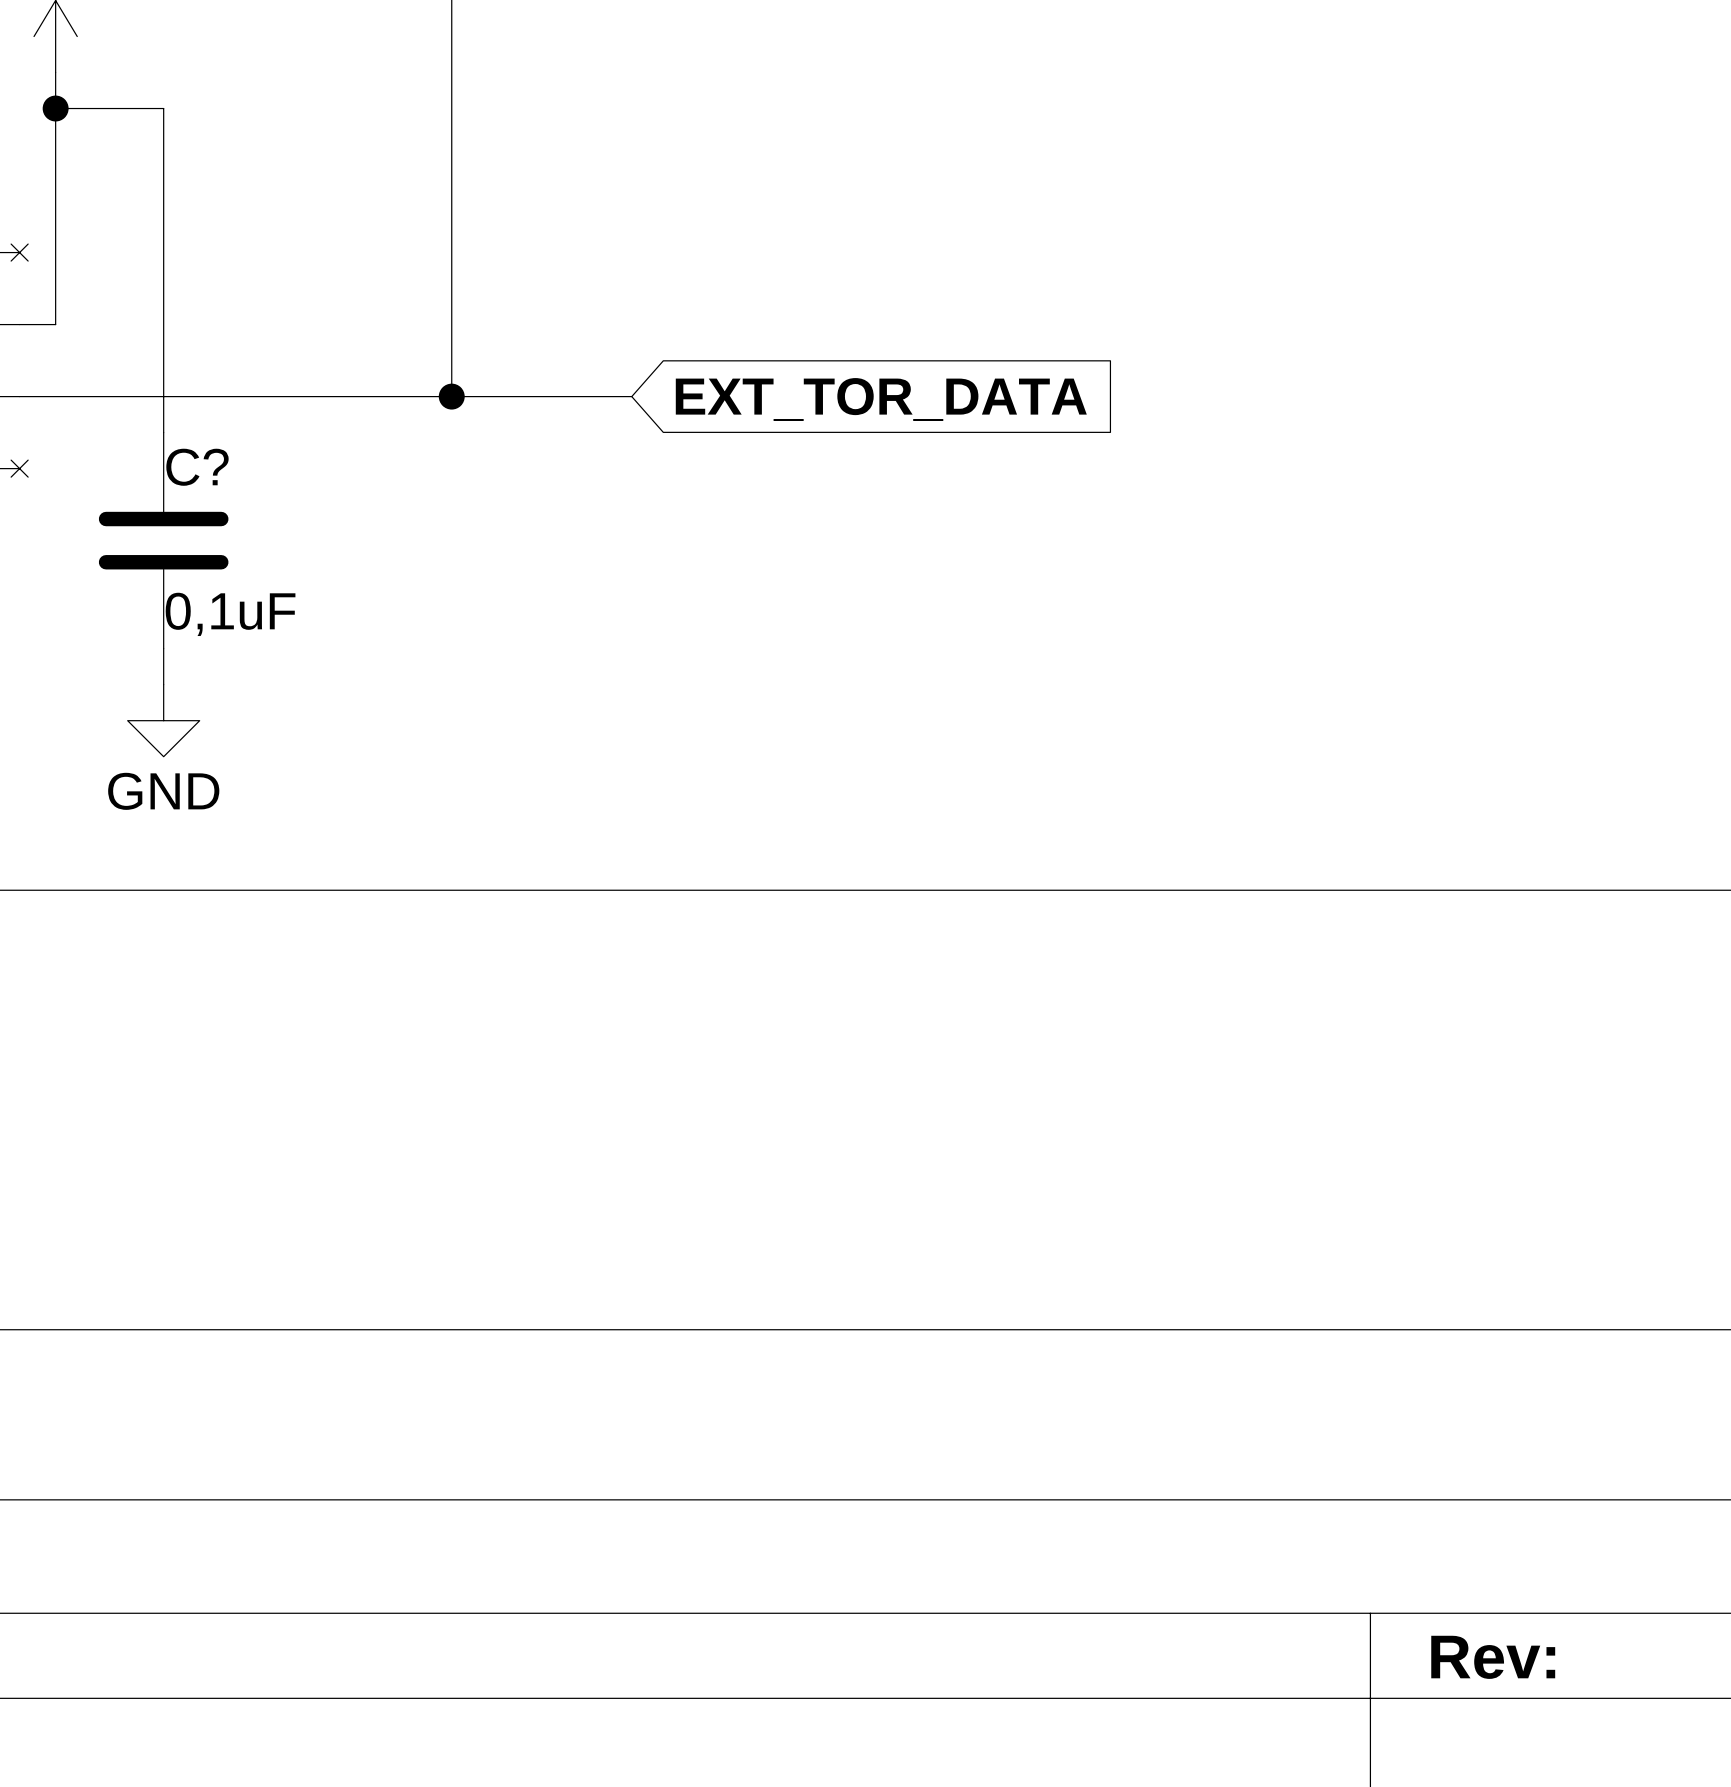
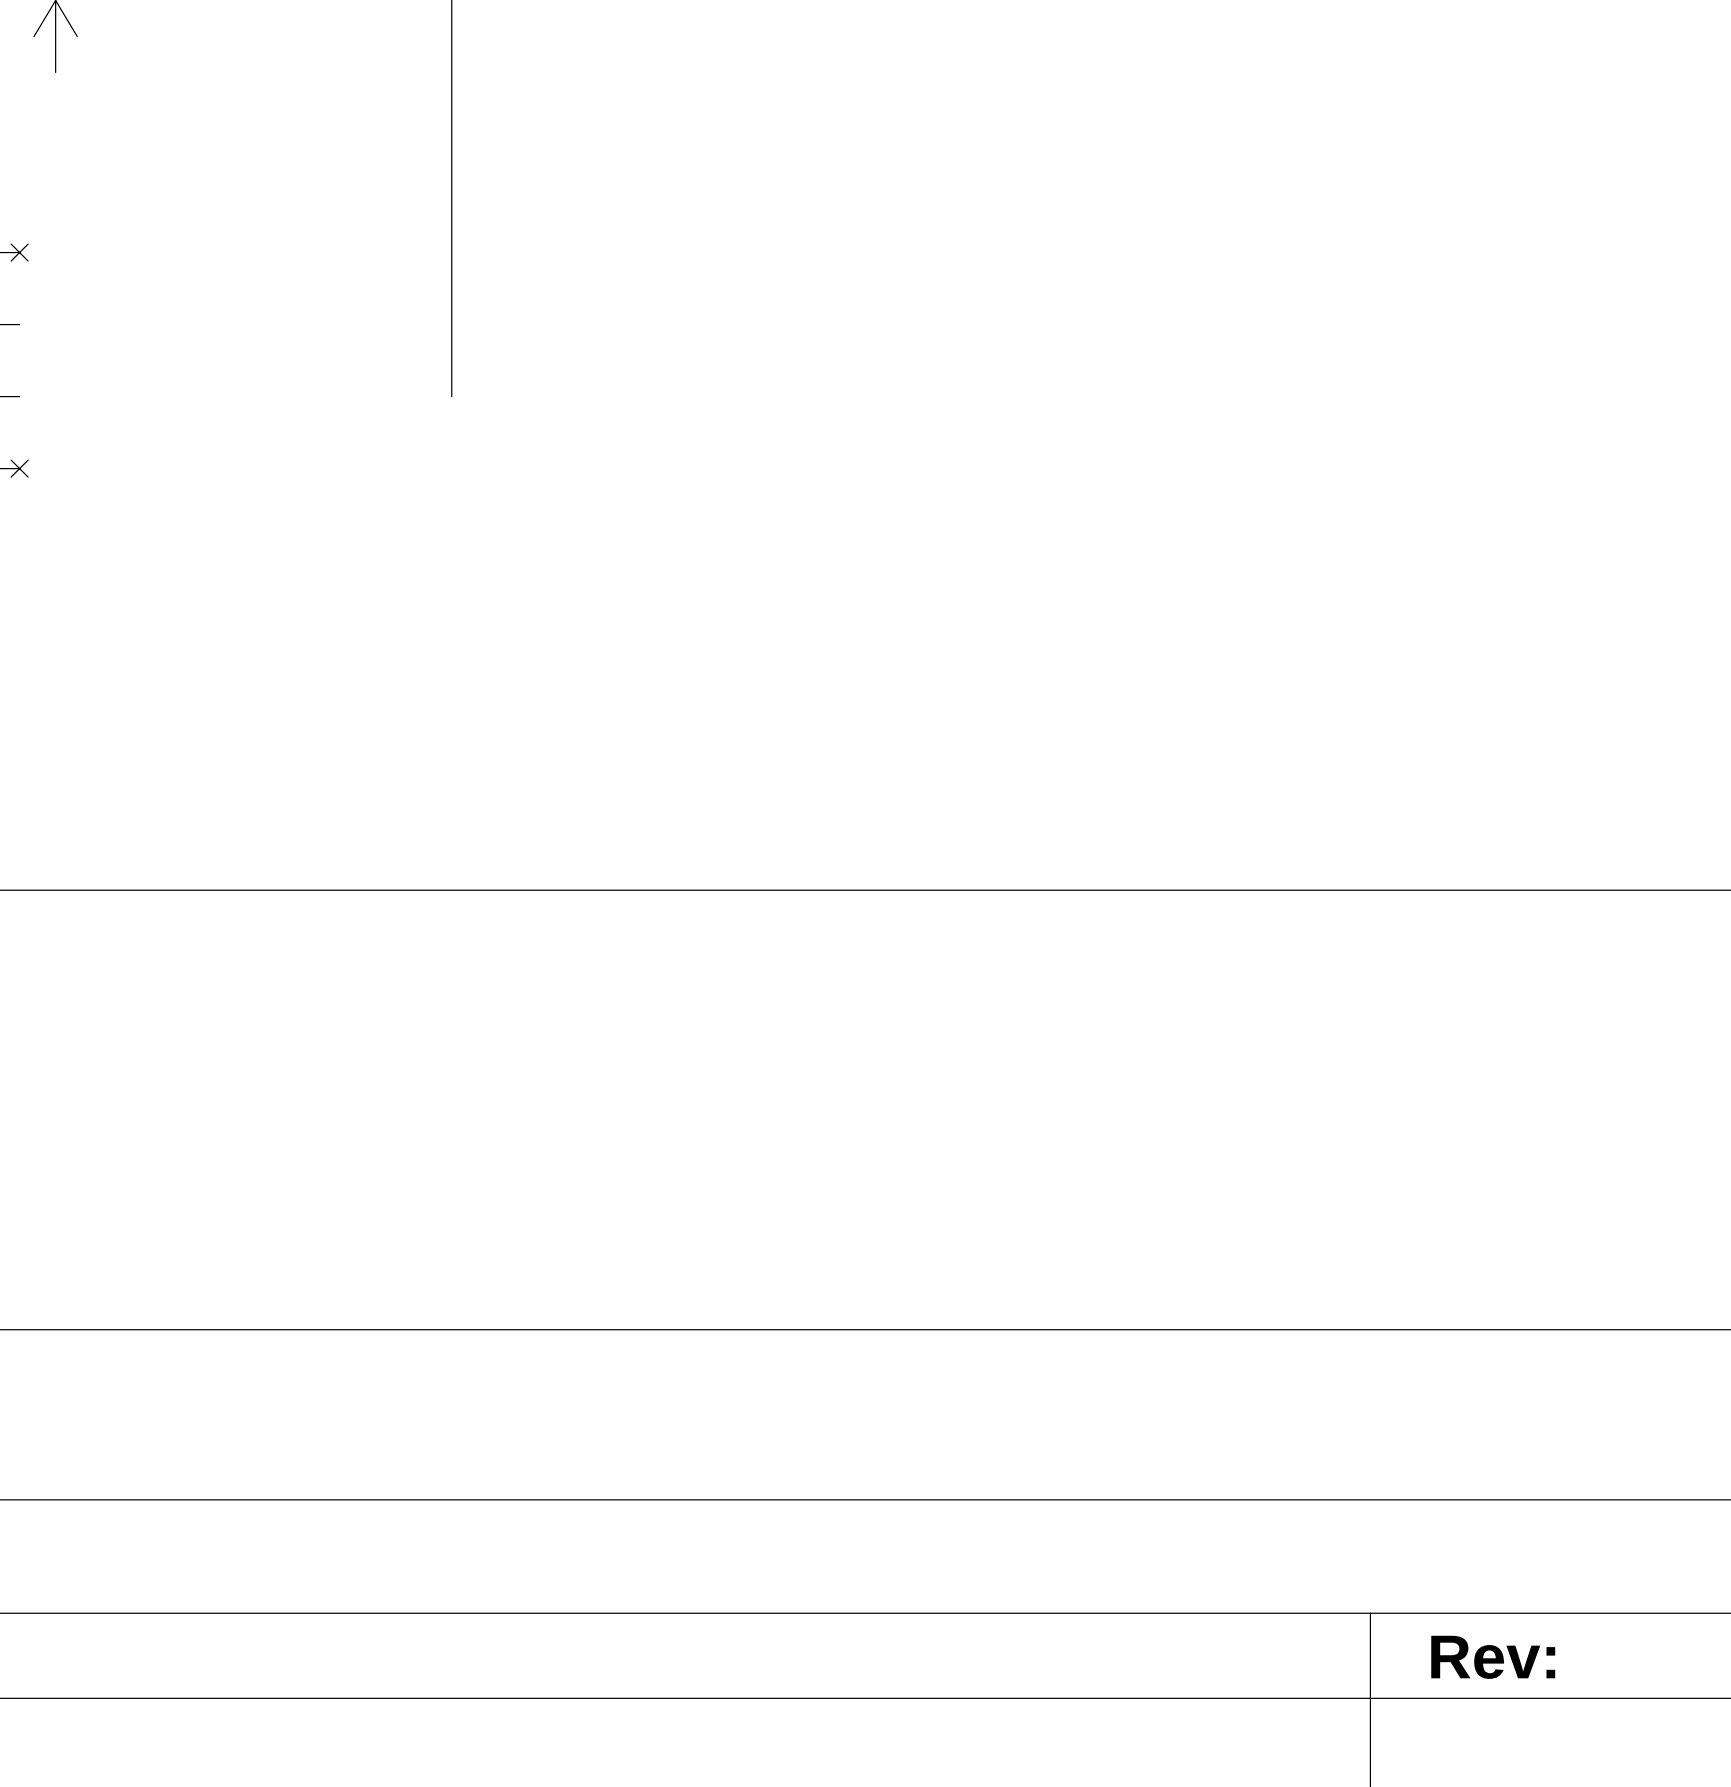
wire: (55, 72) (55, 324) (19, 324) -> none
wire: (55, 108) (163, 108) (163, 432) -> none
junction: (55, 108) -> none
wire: (19, 396) (631, 396) -> none
junction: (451, 396) -> none
global label: EXT_TOR_DATA (881, 399) -> none
C?: 0,1uF (163, 540) -> none
wire: (163, 648) (163, 684) -> none
power symbol: GND (163, 720) -> none

